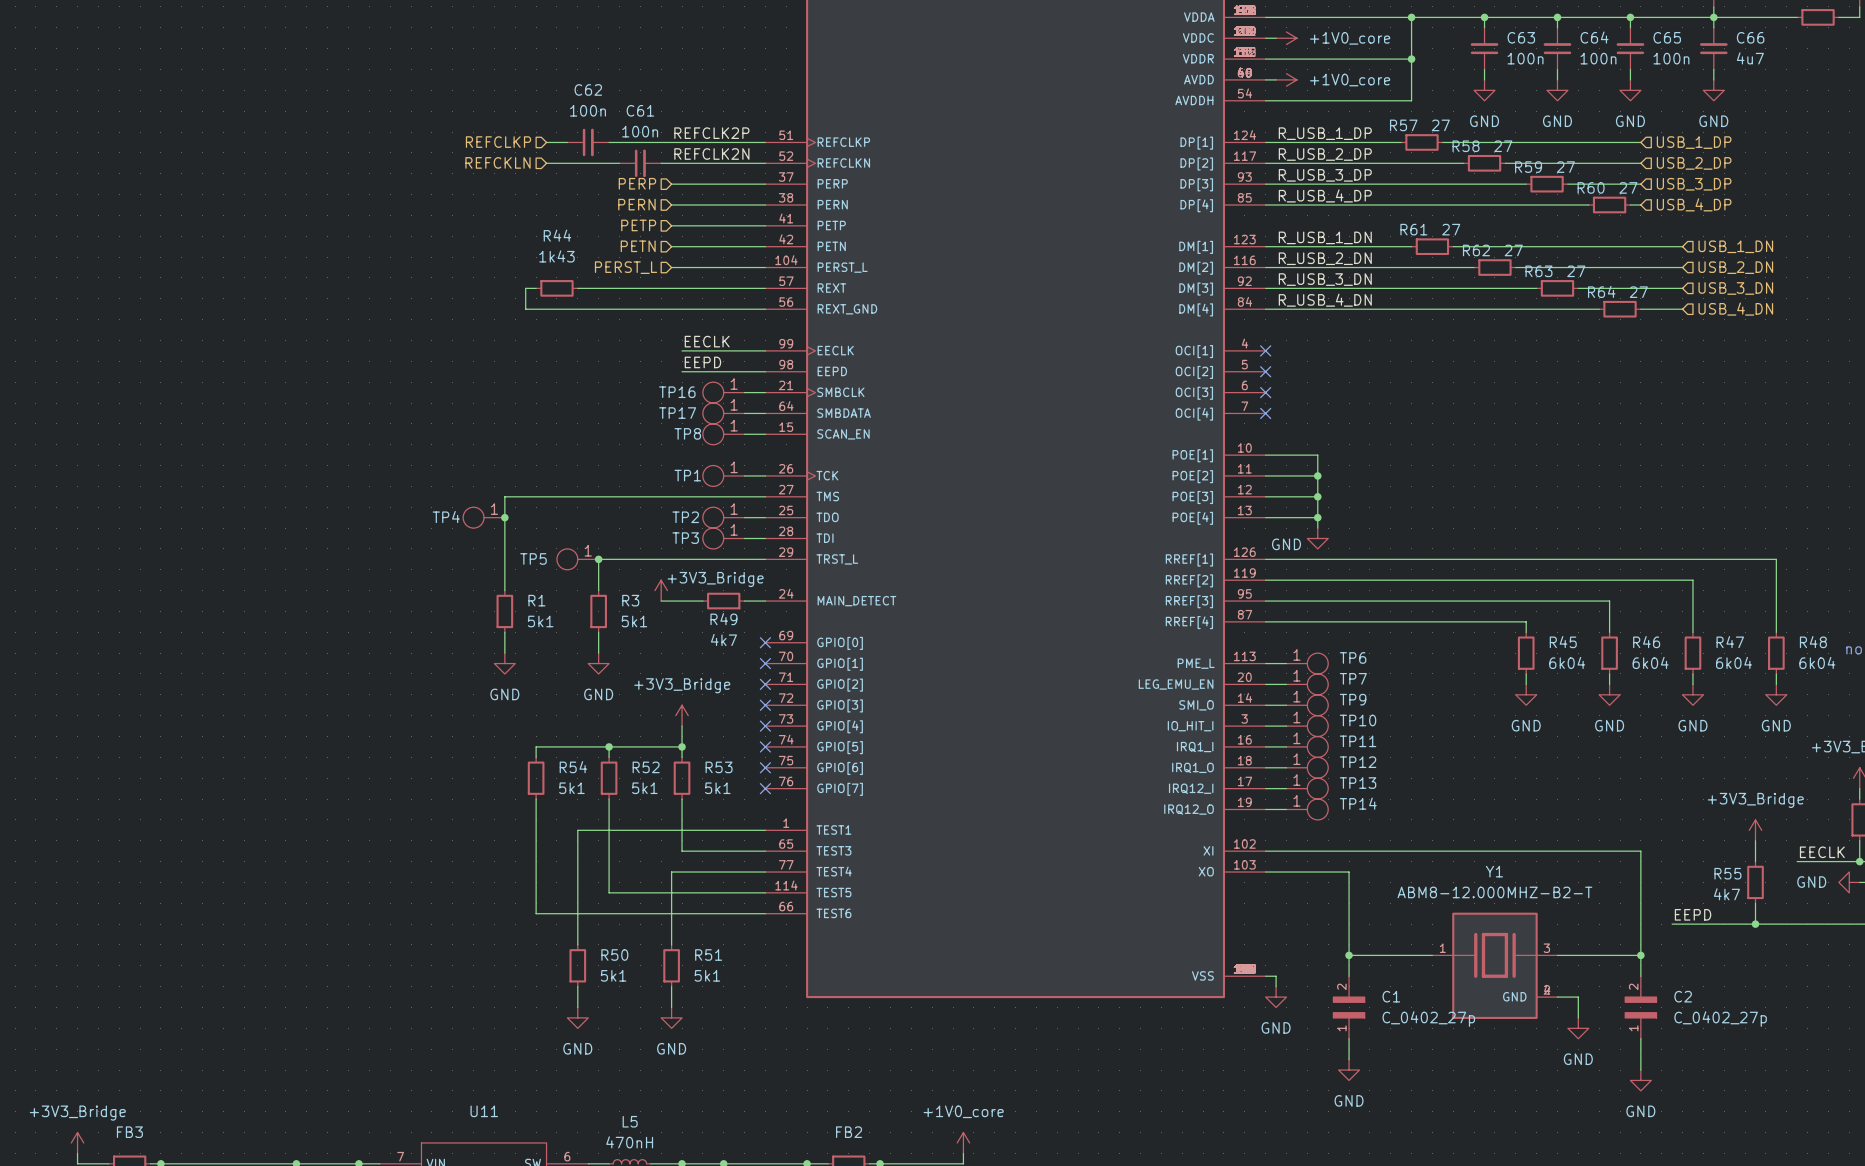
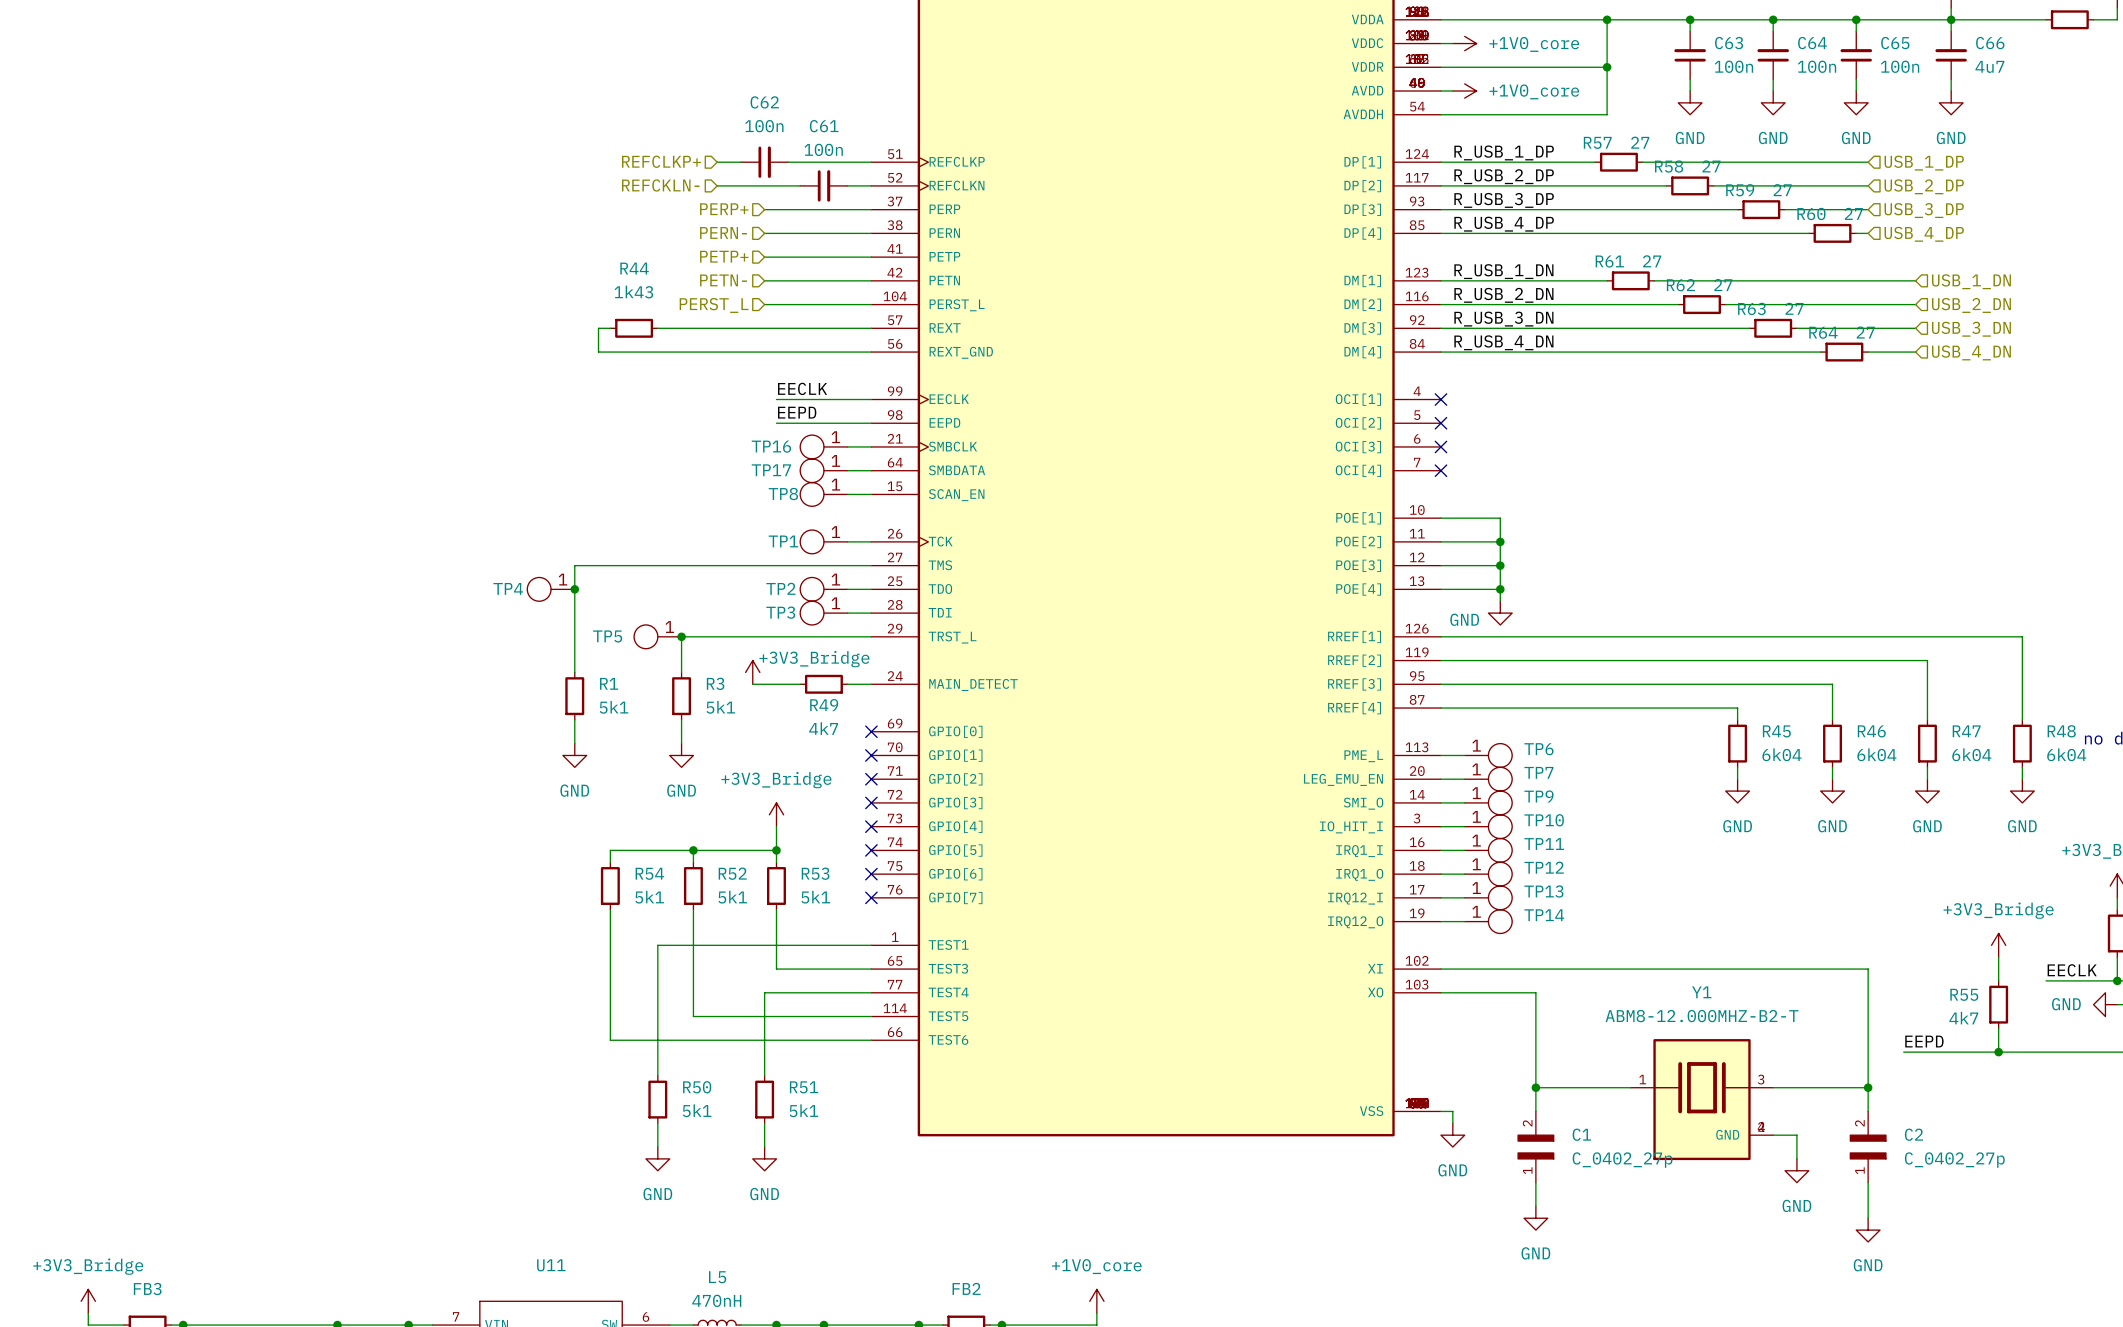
label: REFCLK2P (711, 133) -> none
hierarchical label: REFCLKP (498, 142) -> none
wire: (546, 142) (567, 142) -> none
hierarchical label: none -> REFCLKP+ (661, 161)
C62 position: (588, 142) -> (764, 162)
wire: (609, 142) (629, 142) -> none
label: REFCLK2N (711, 154) -> none
hierarchical label: REFCKLN (497, 162) -> none
hierarchical label: none -> REFCKLN- (660, 185)
wire: (546, 163) (619, 163) -> none
C61 position: (640, 163) -> (823, 185)
hierarchical label: PERP (637, 183) -> PERP+ (724, 209)
hierarchical label: PERN (636, 204) -> PERN- (723, 232)
hierarchical label: PETP (638, 225) -> PETP+ (724, 256)
hierarchical label: PETN (638, 246) -> PETN- (723, 280)

